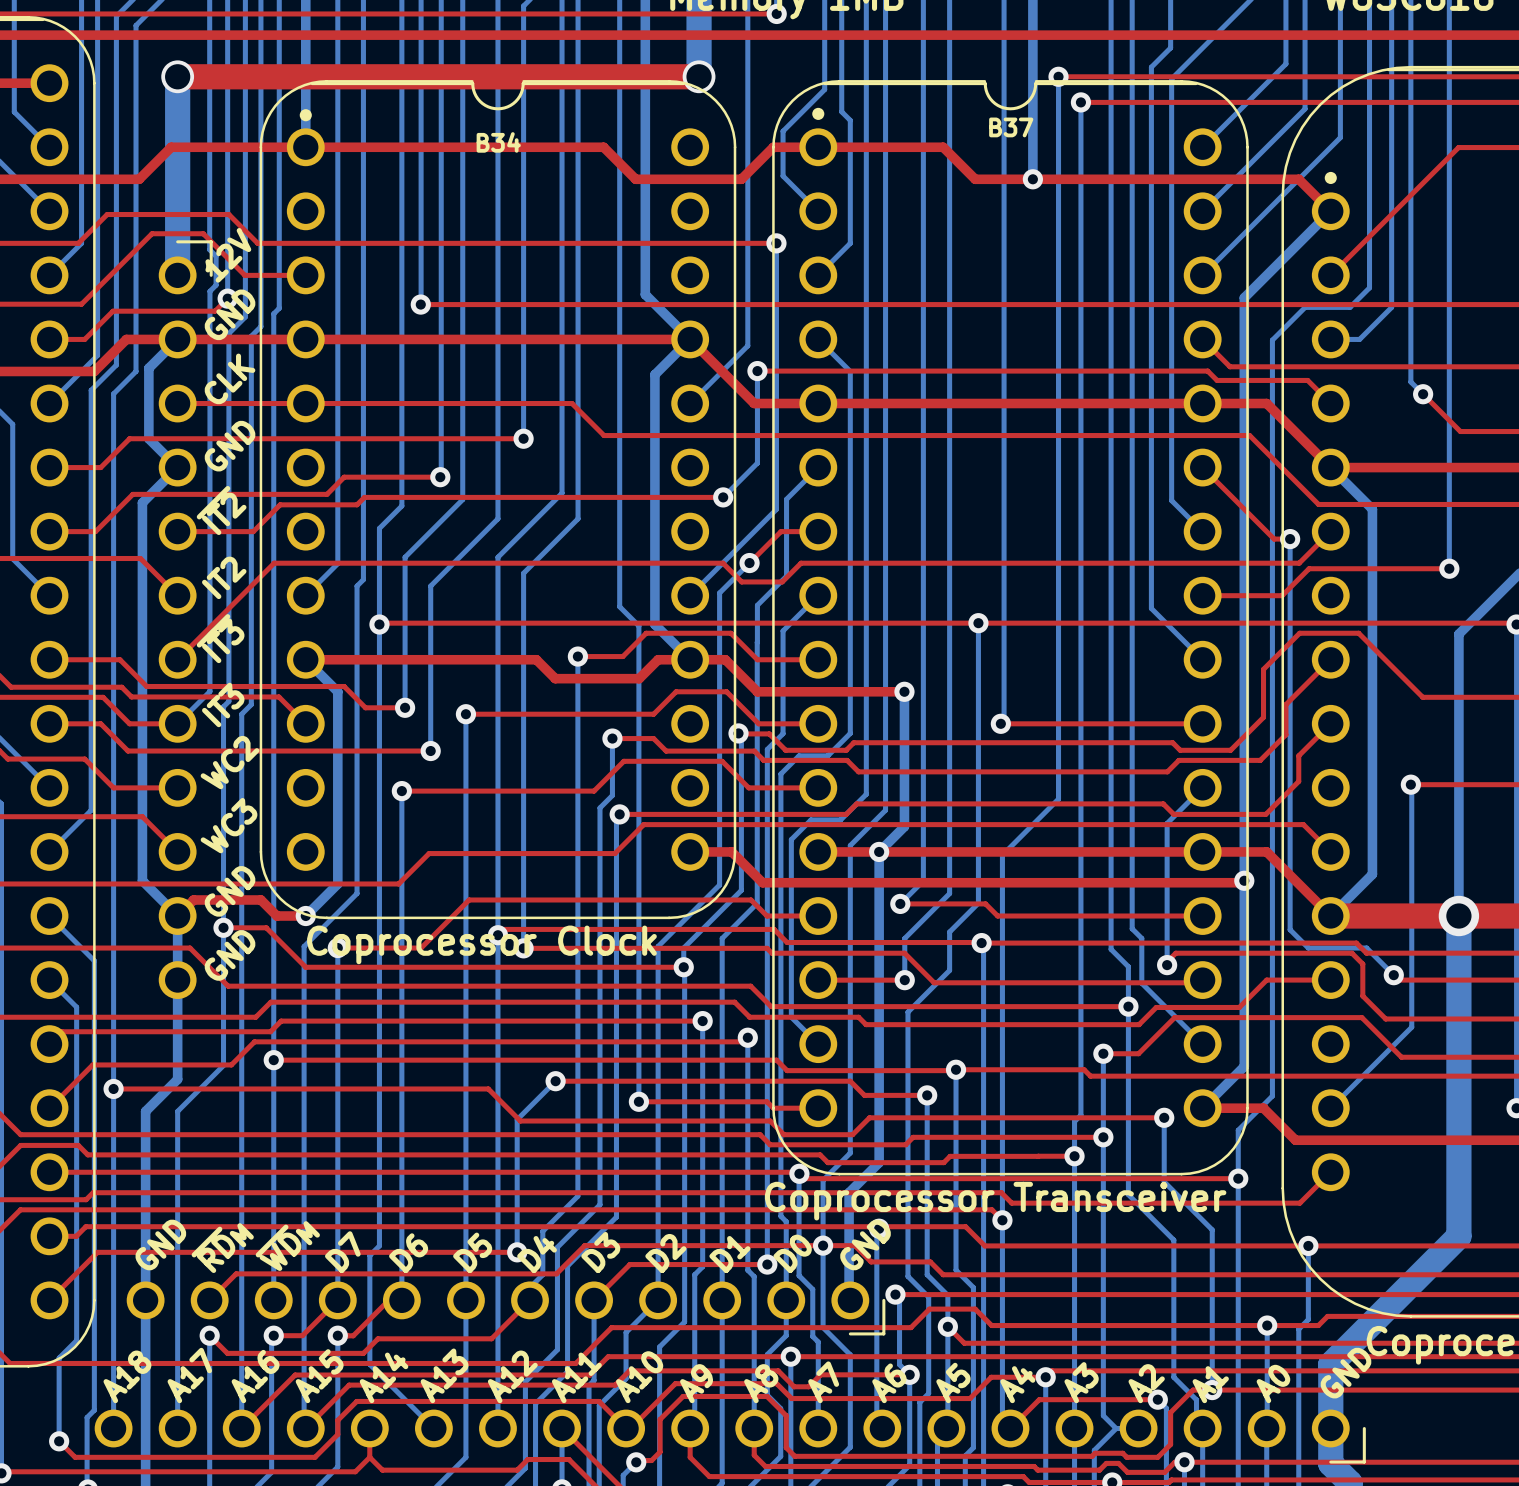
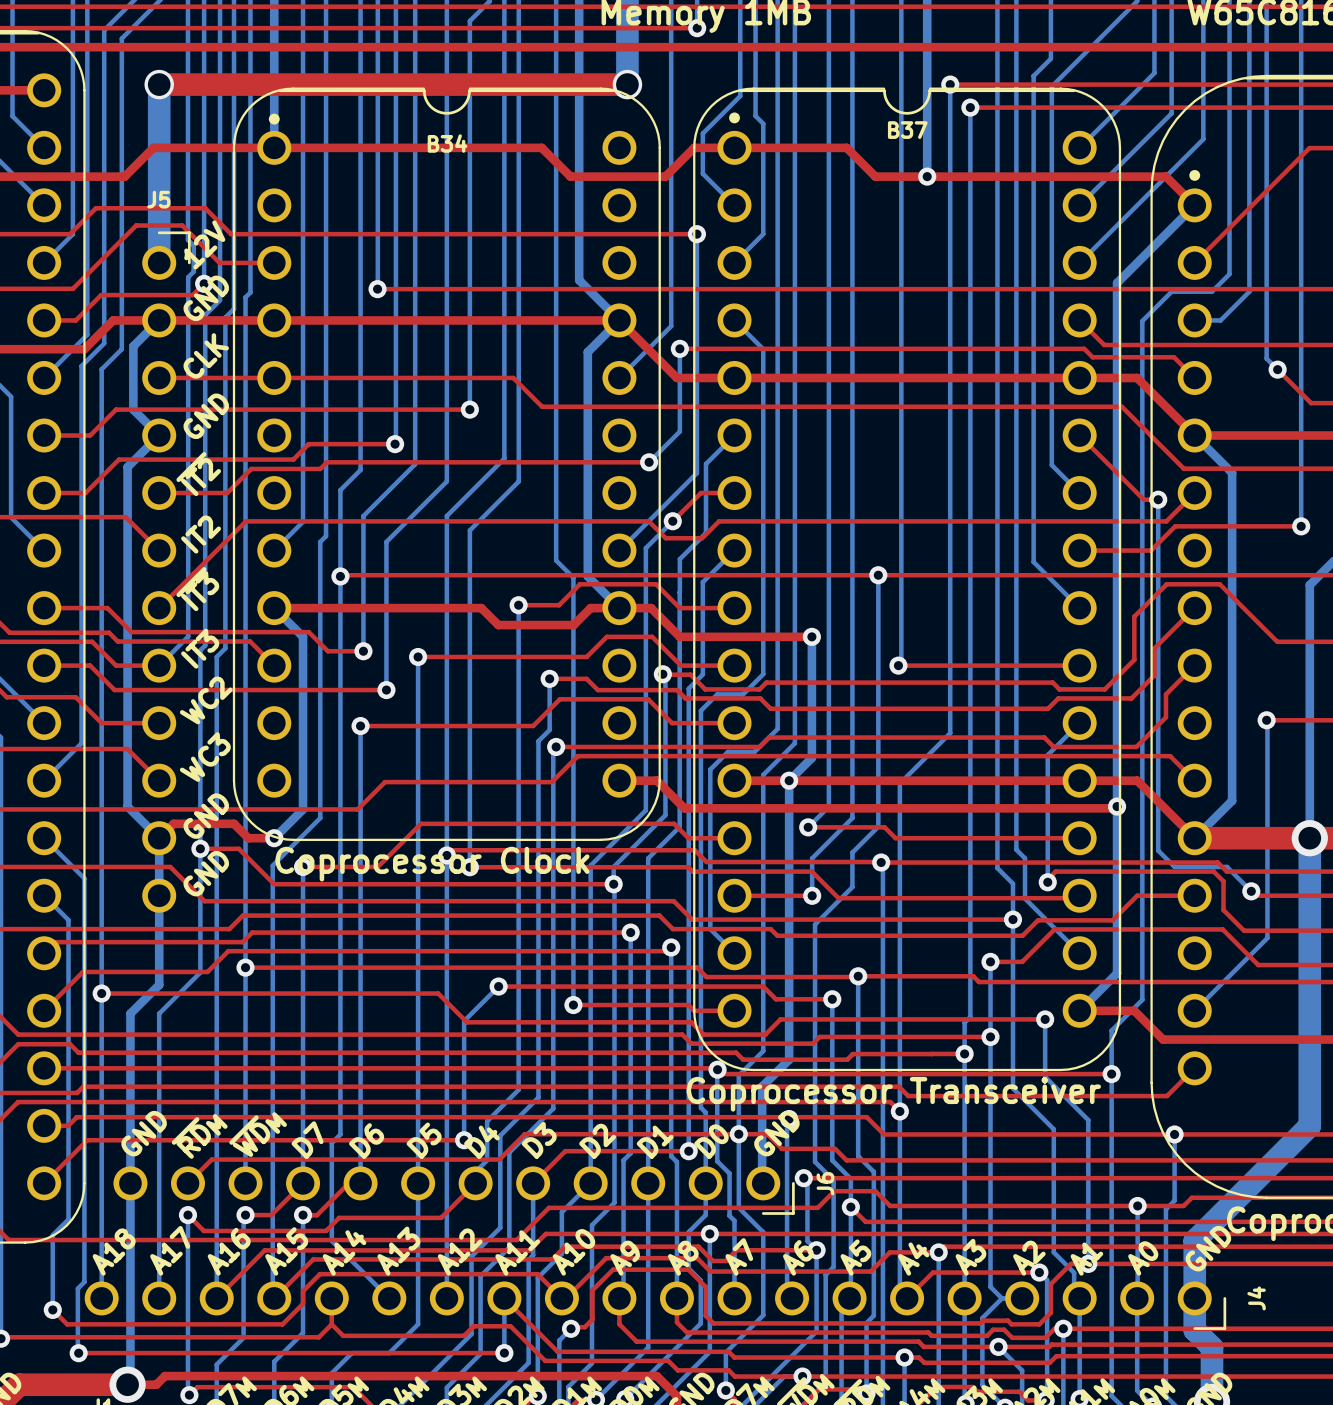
J5 name: none -> J5 (158, 199)
J6 name: none -> J6 (825, 1183)
J4 name: none -> J4 (1256, 1298)

